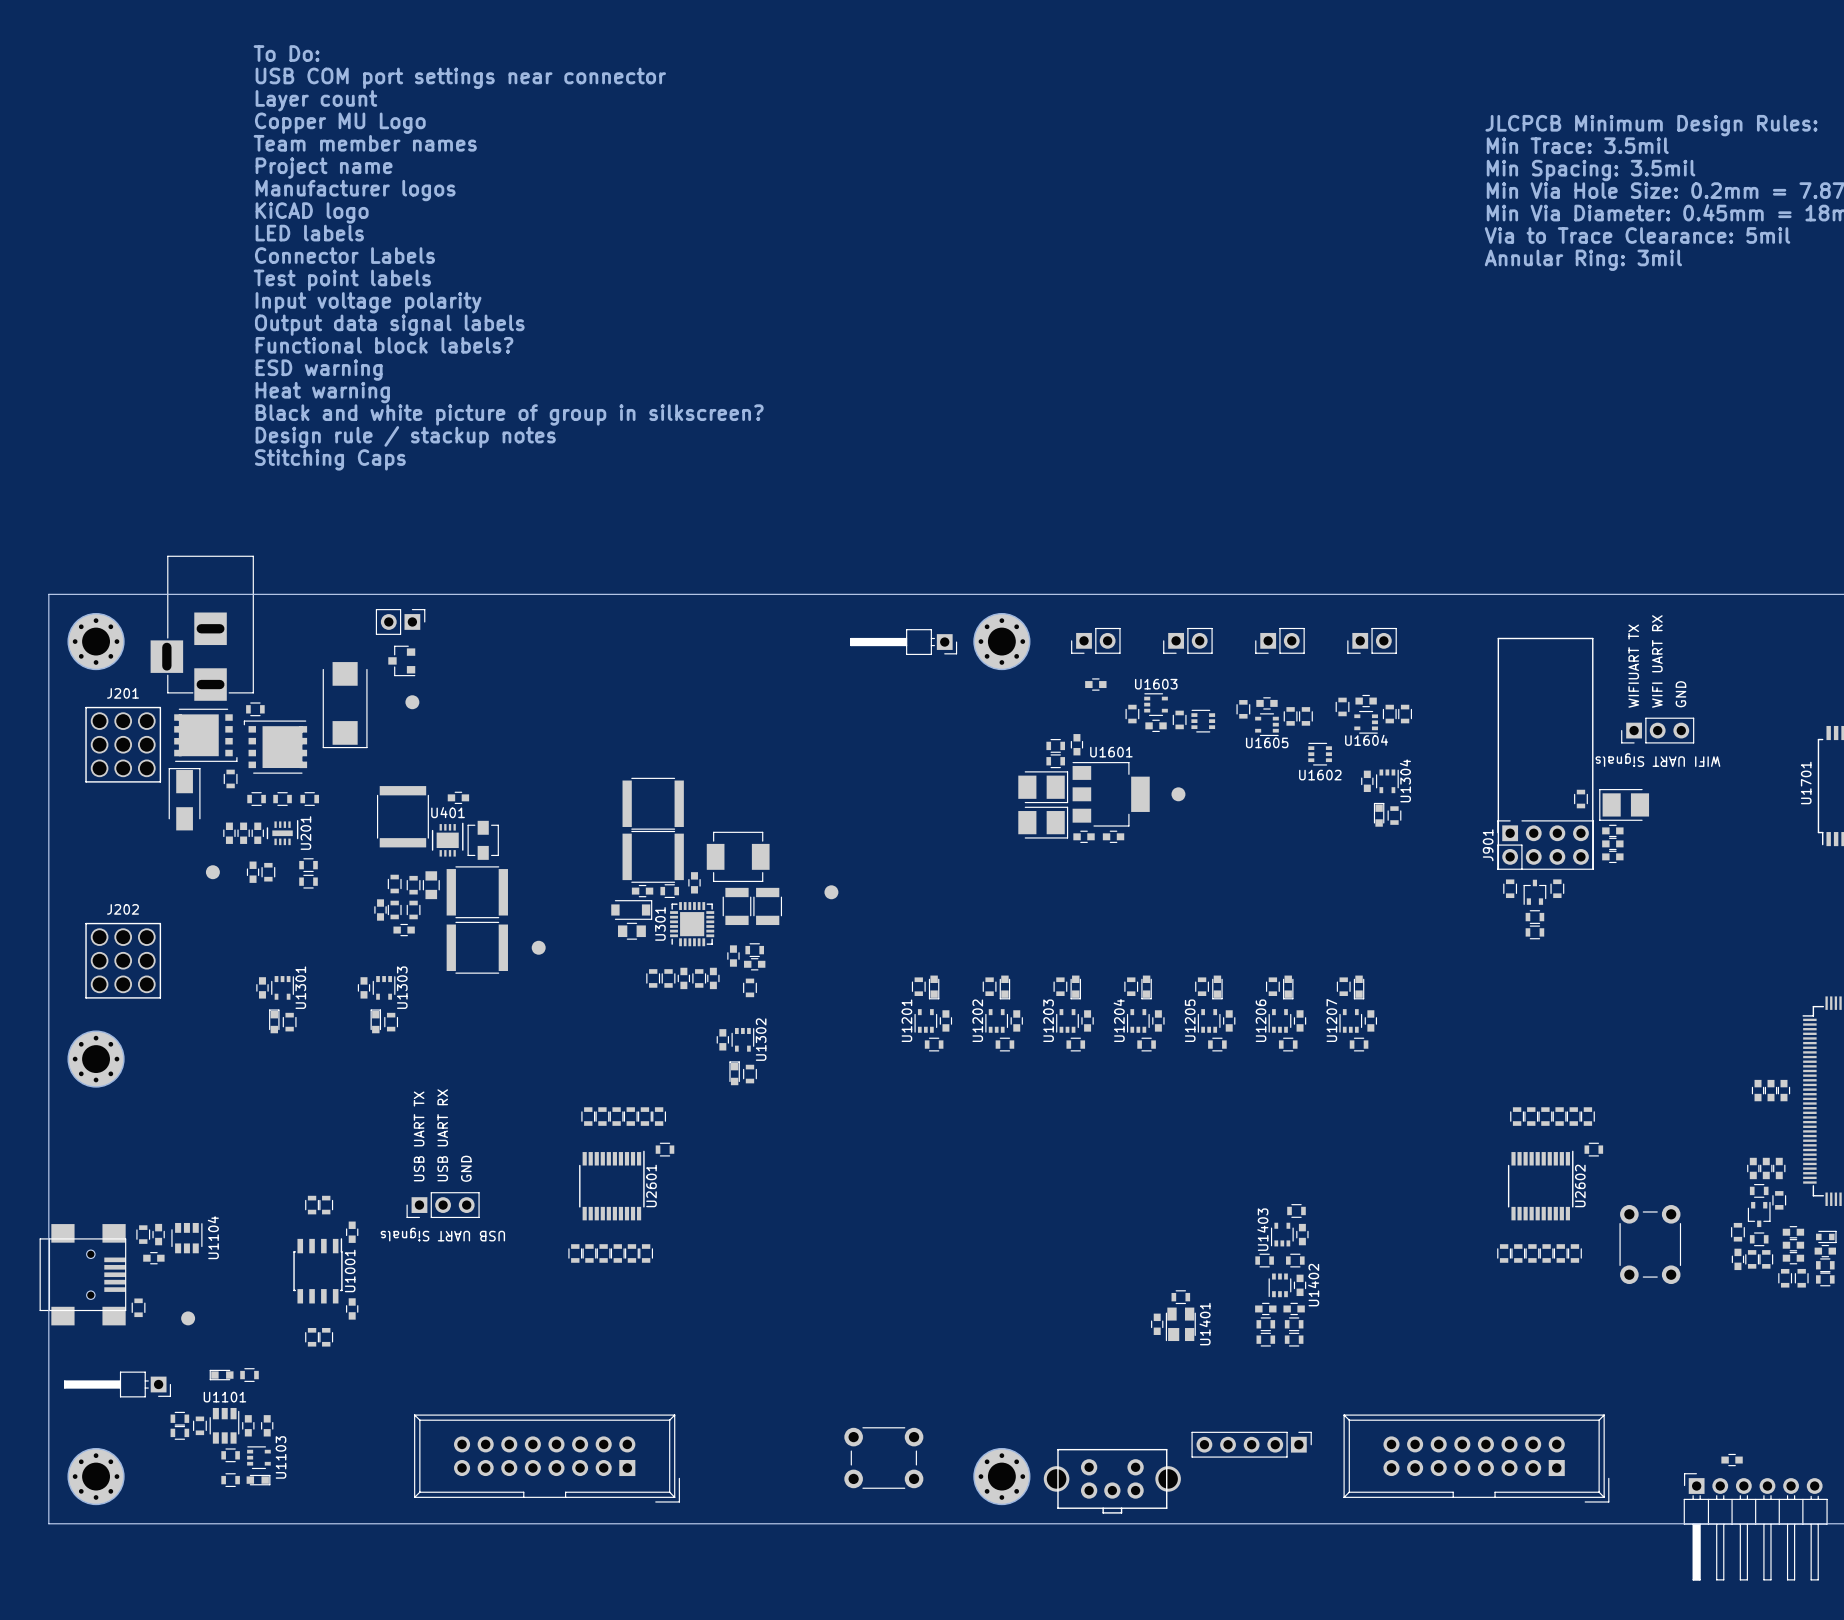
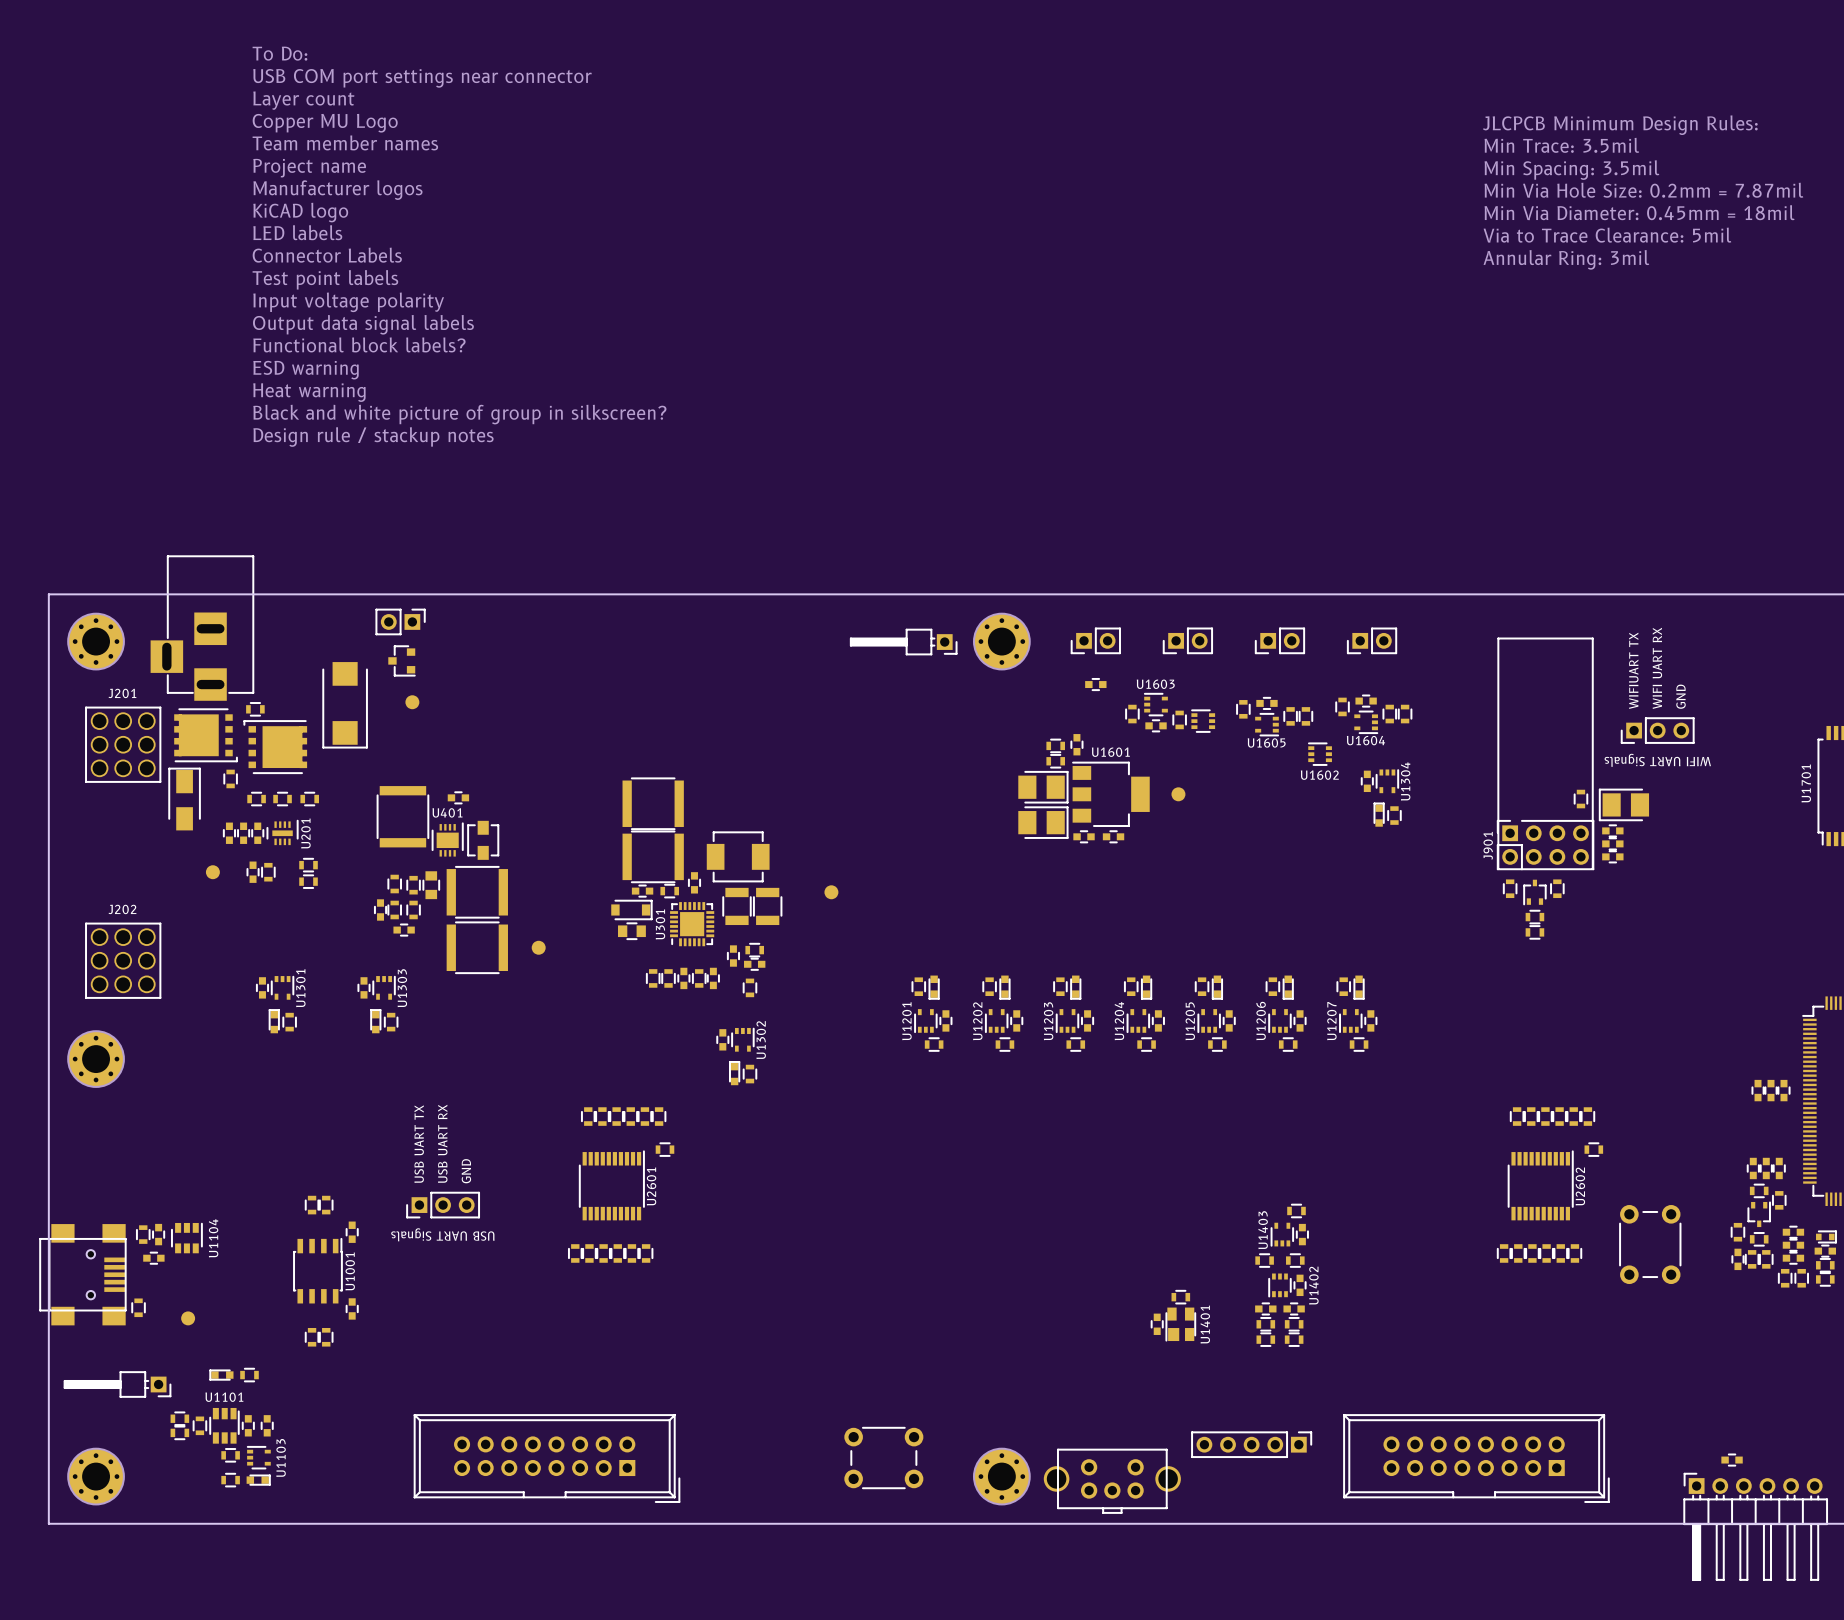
text: Stitching Caps (330, 459) -> none

